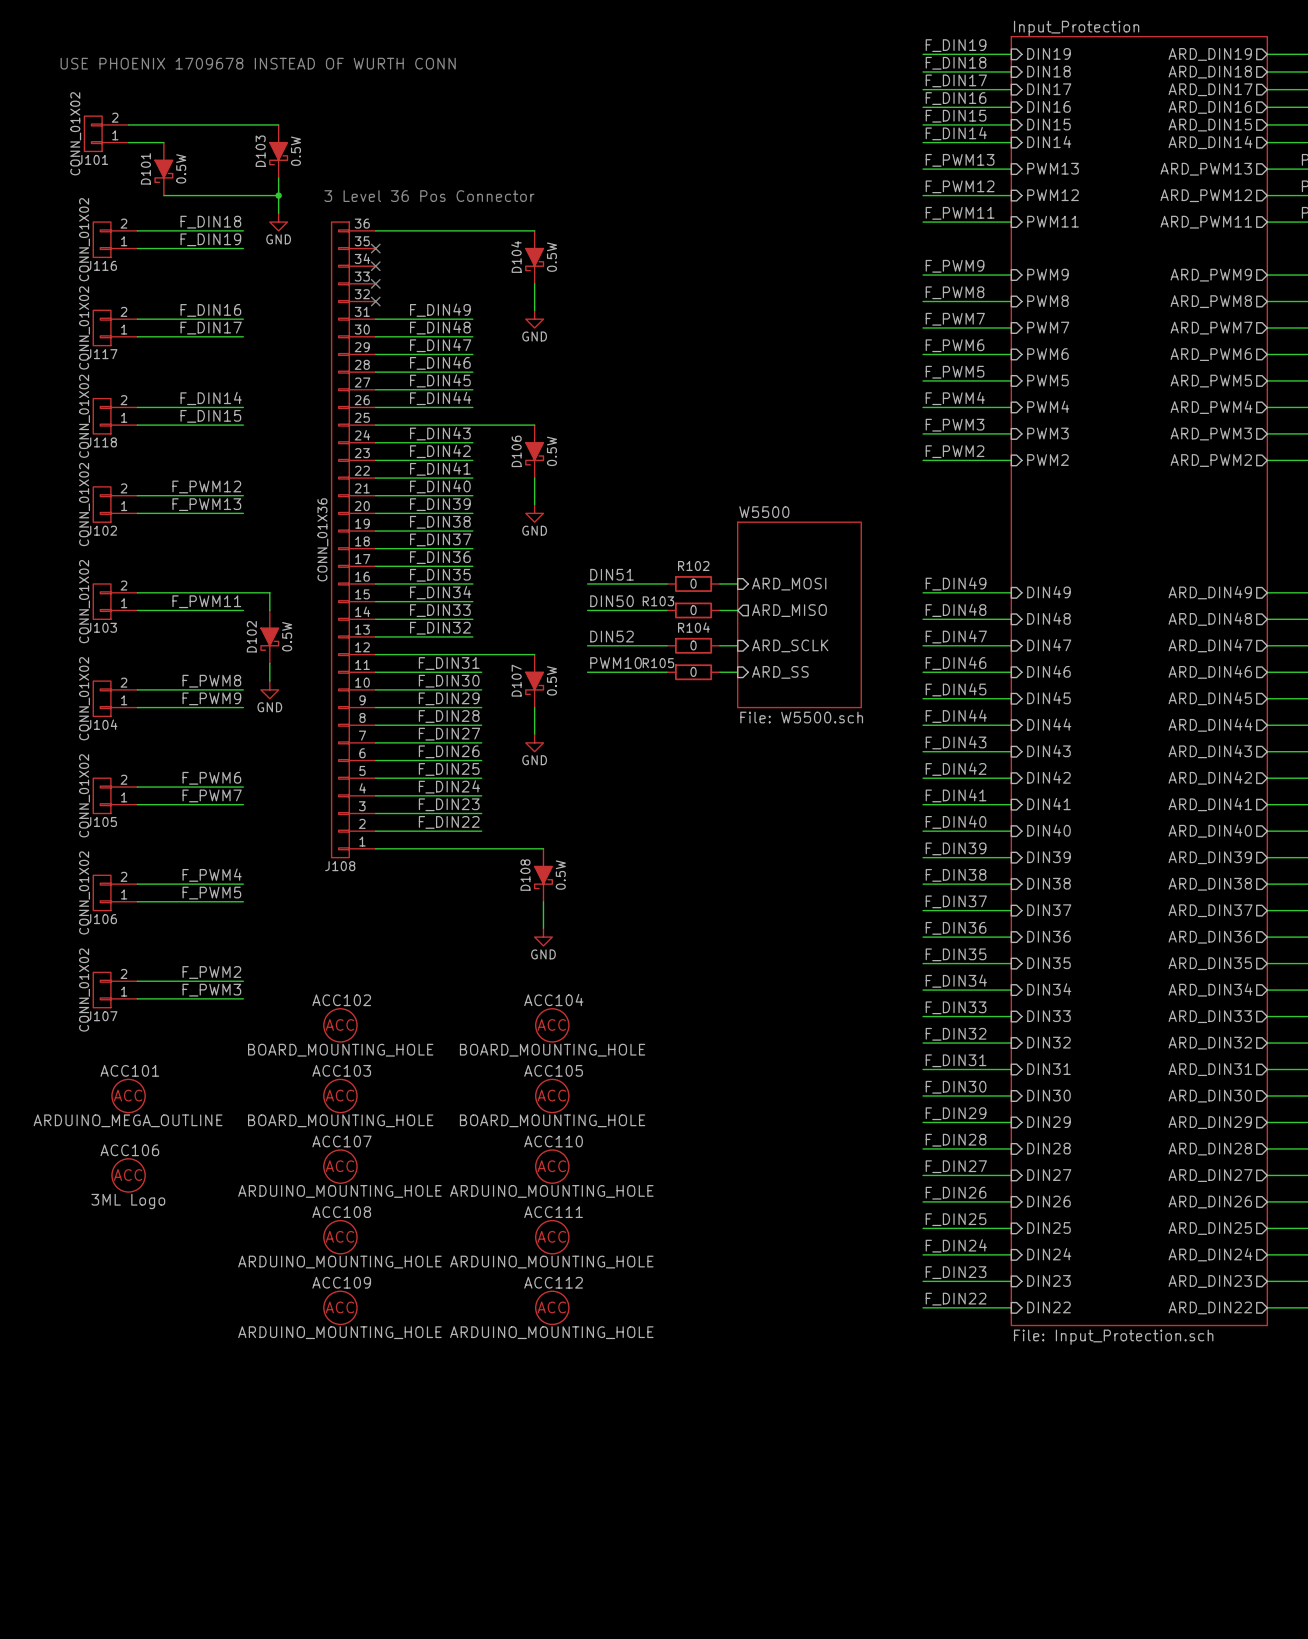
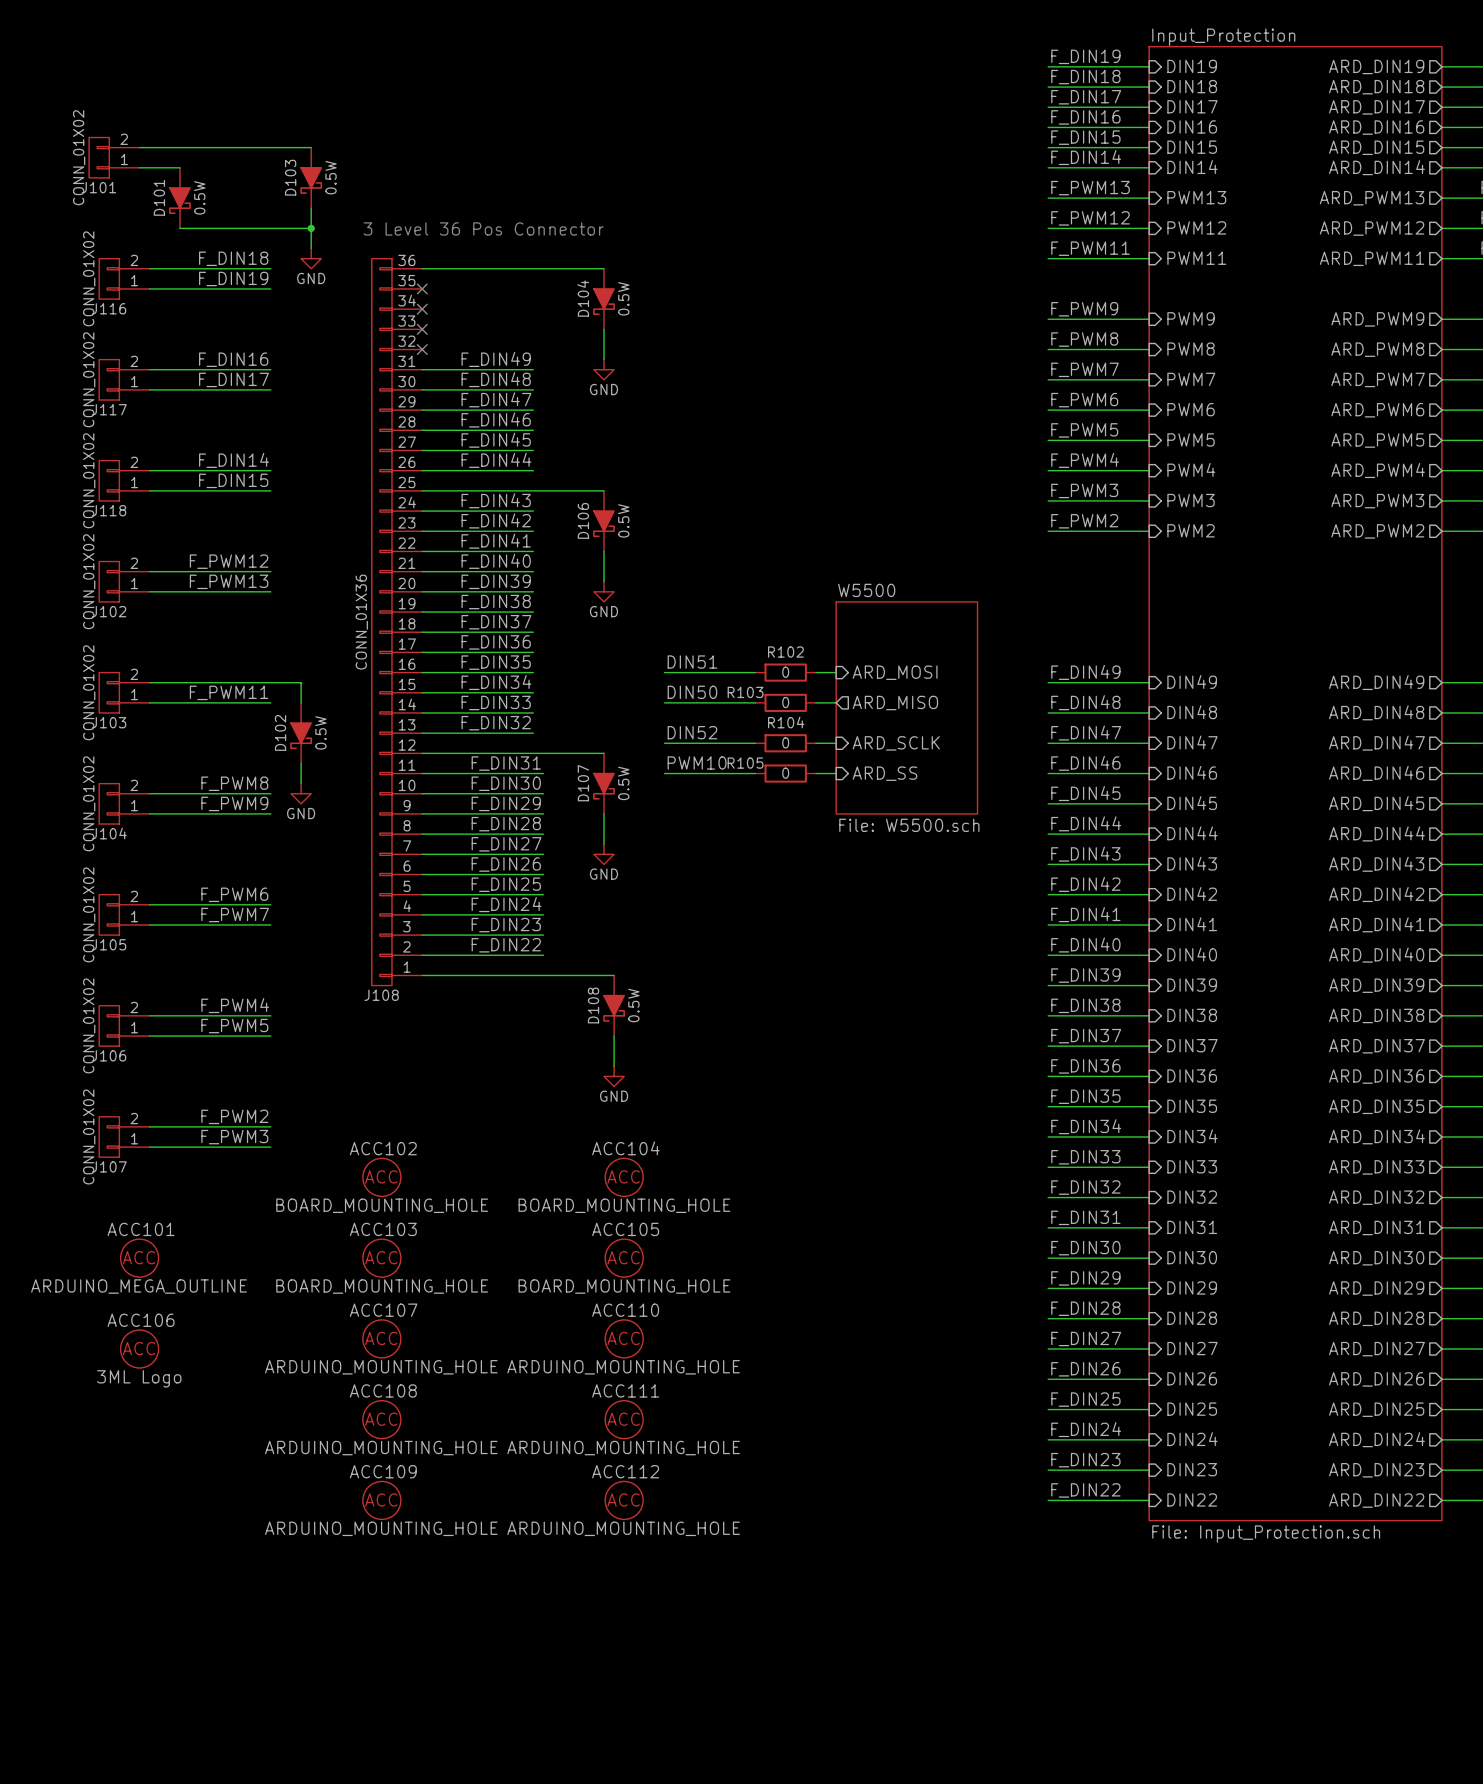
text: USE PHOENIX 1709678 INSTEAD OF WURTH CONN (258, 63) -> none

